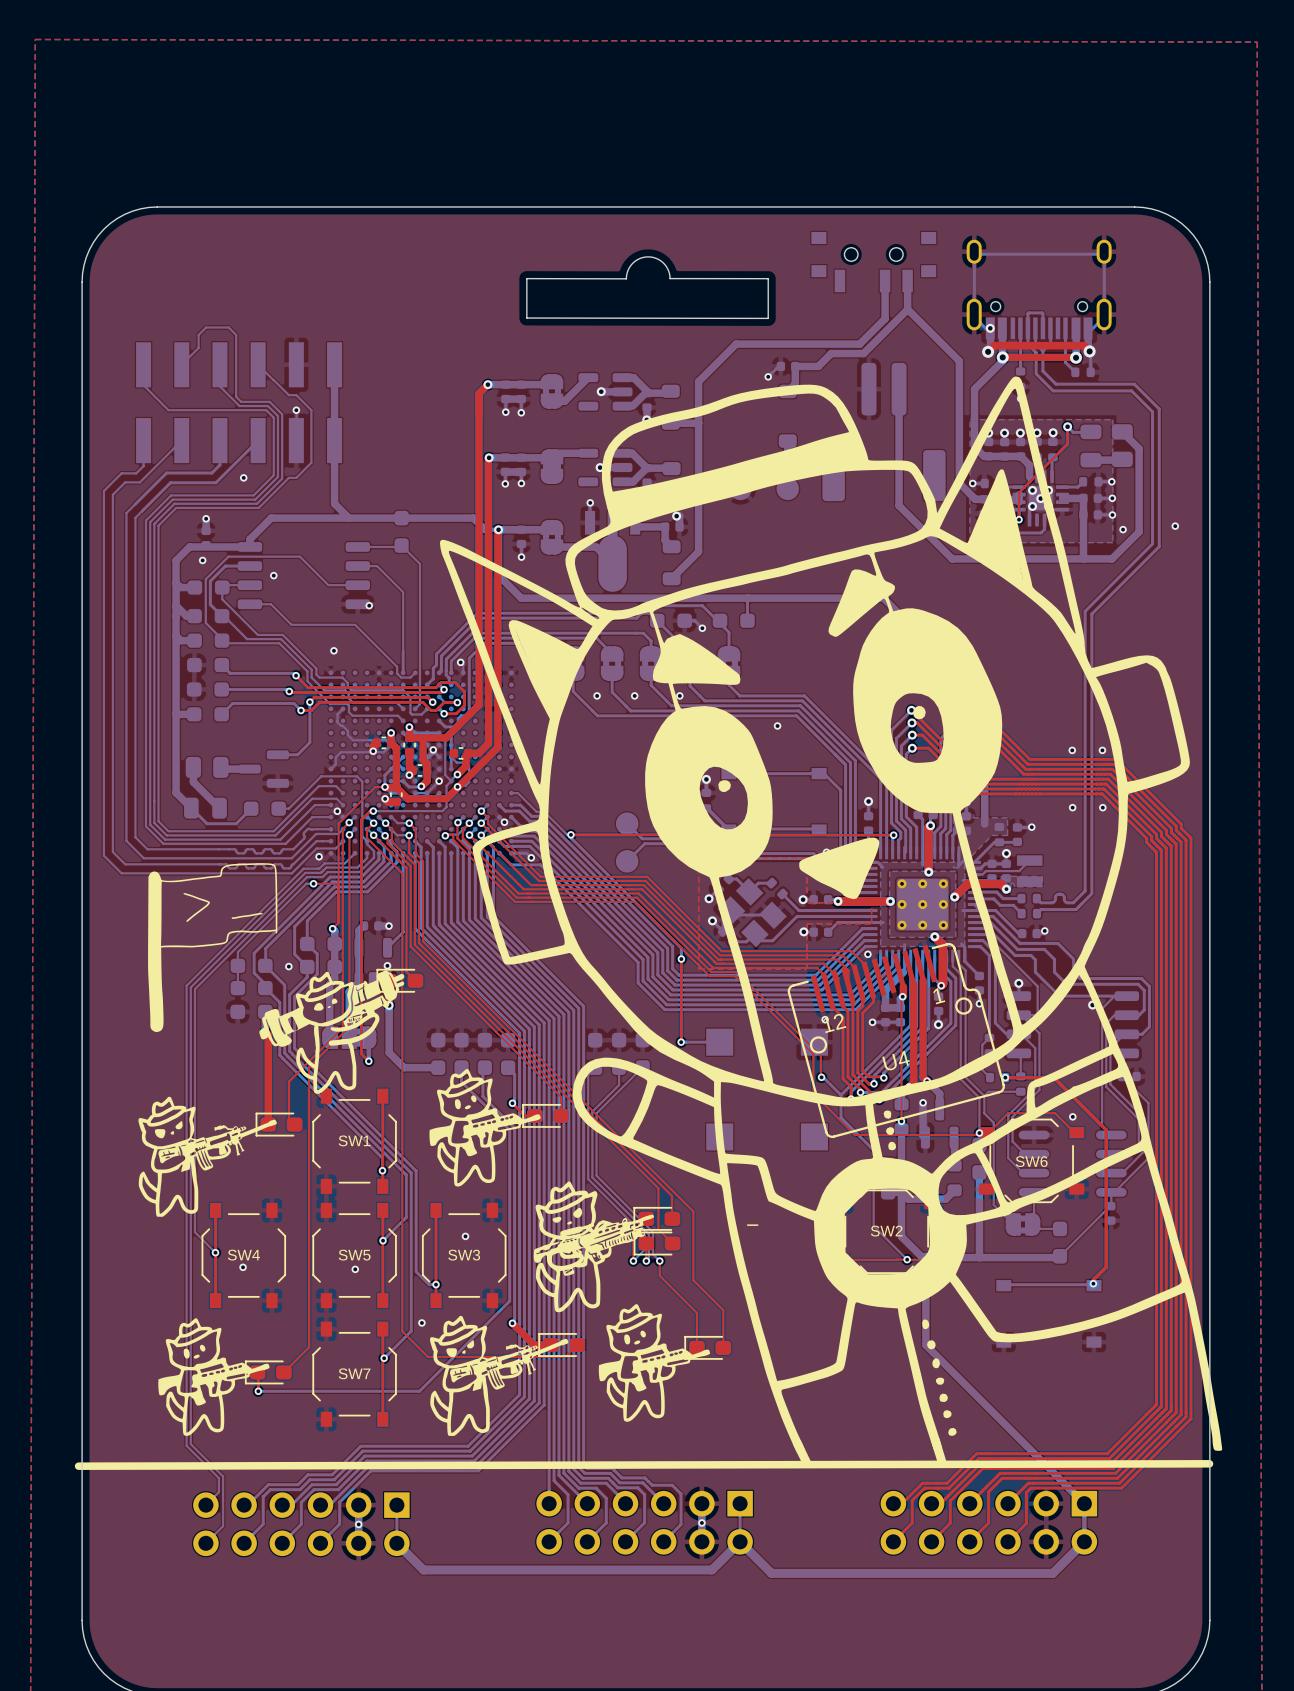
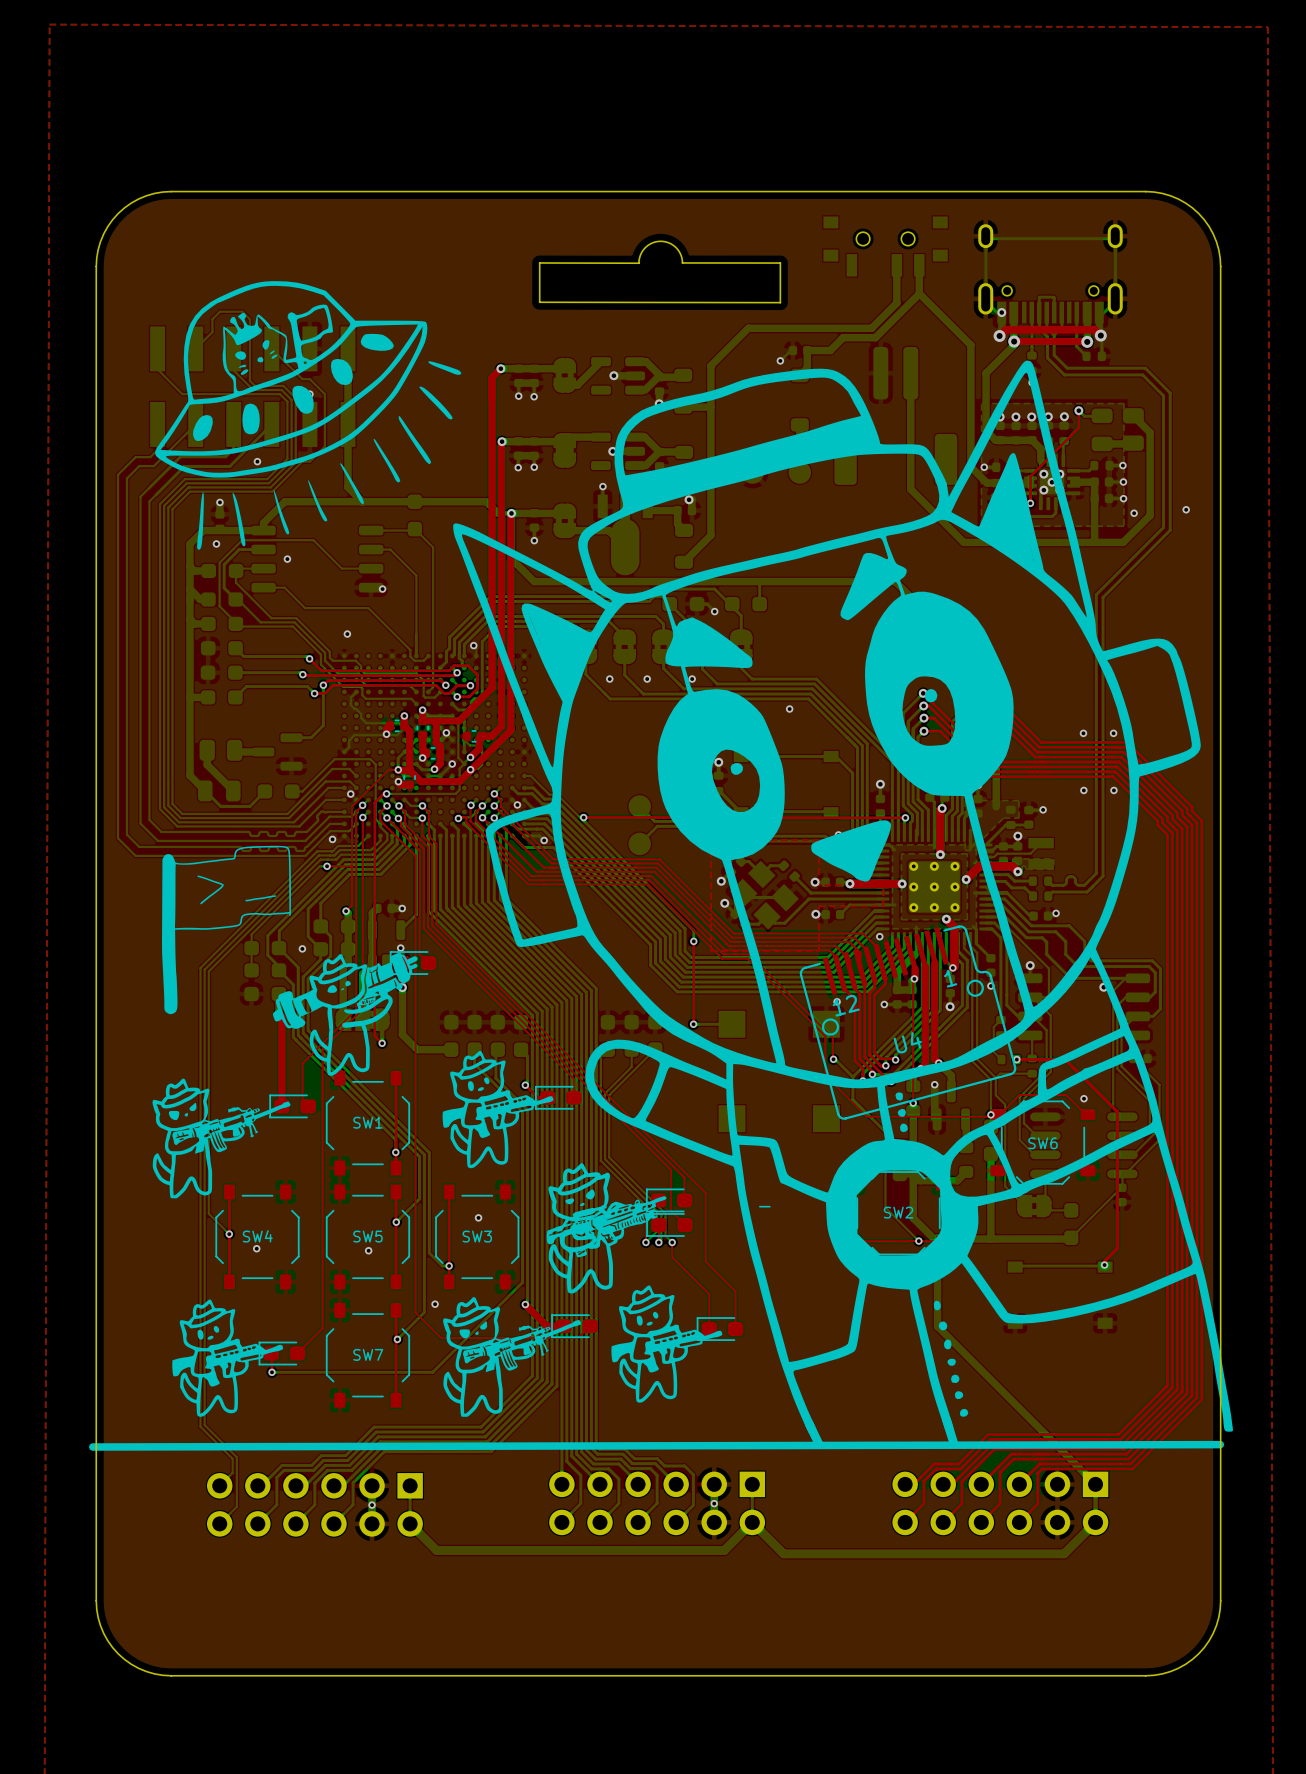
drawing: none -> [155, 281, 462, 550]

